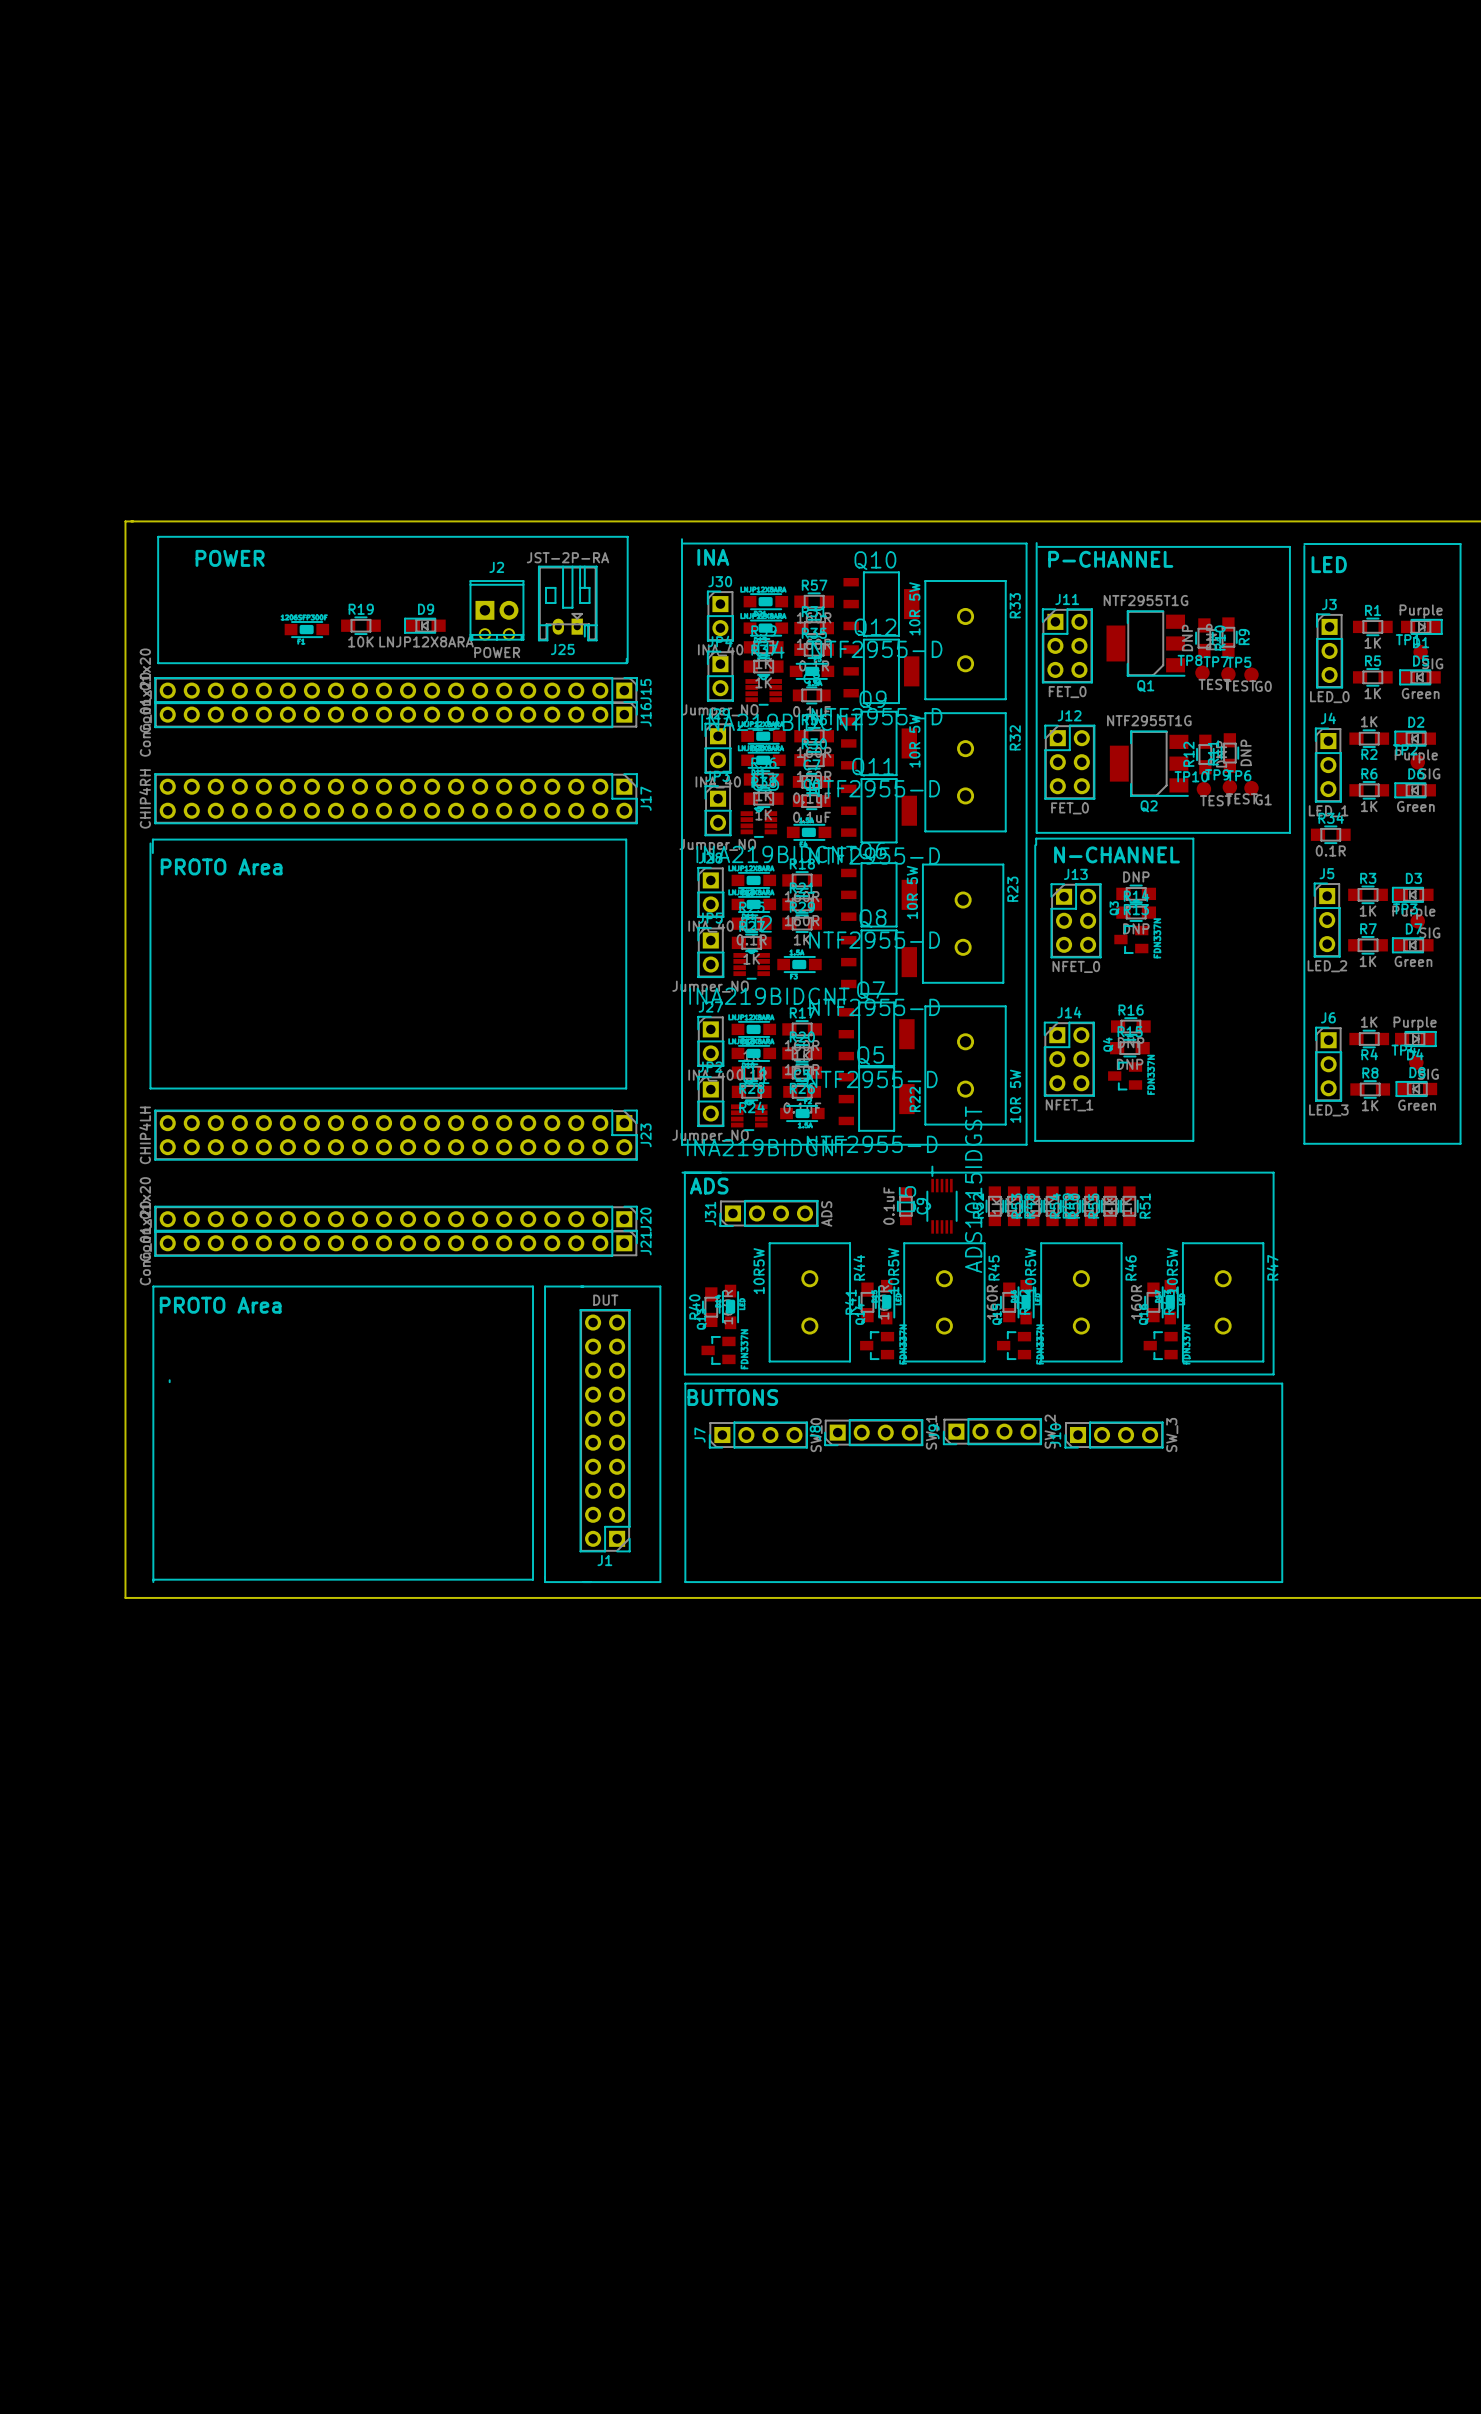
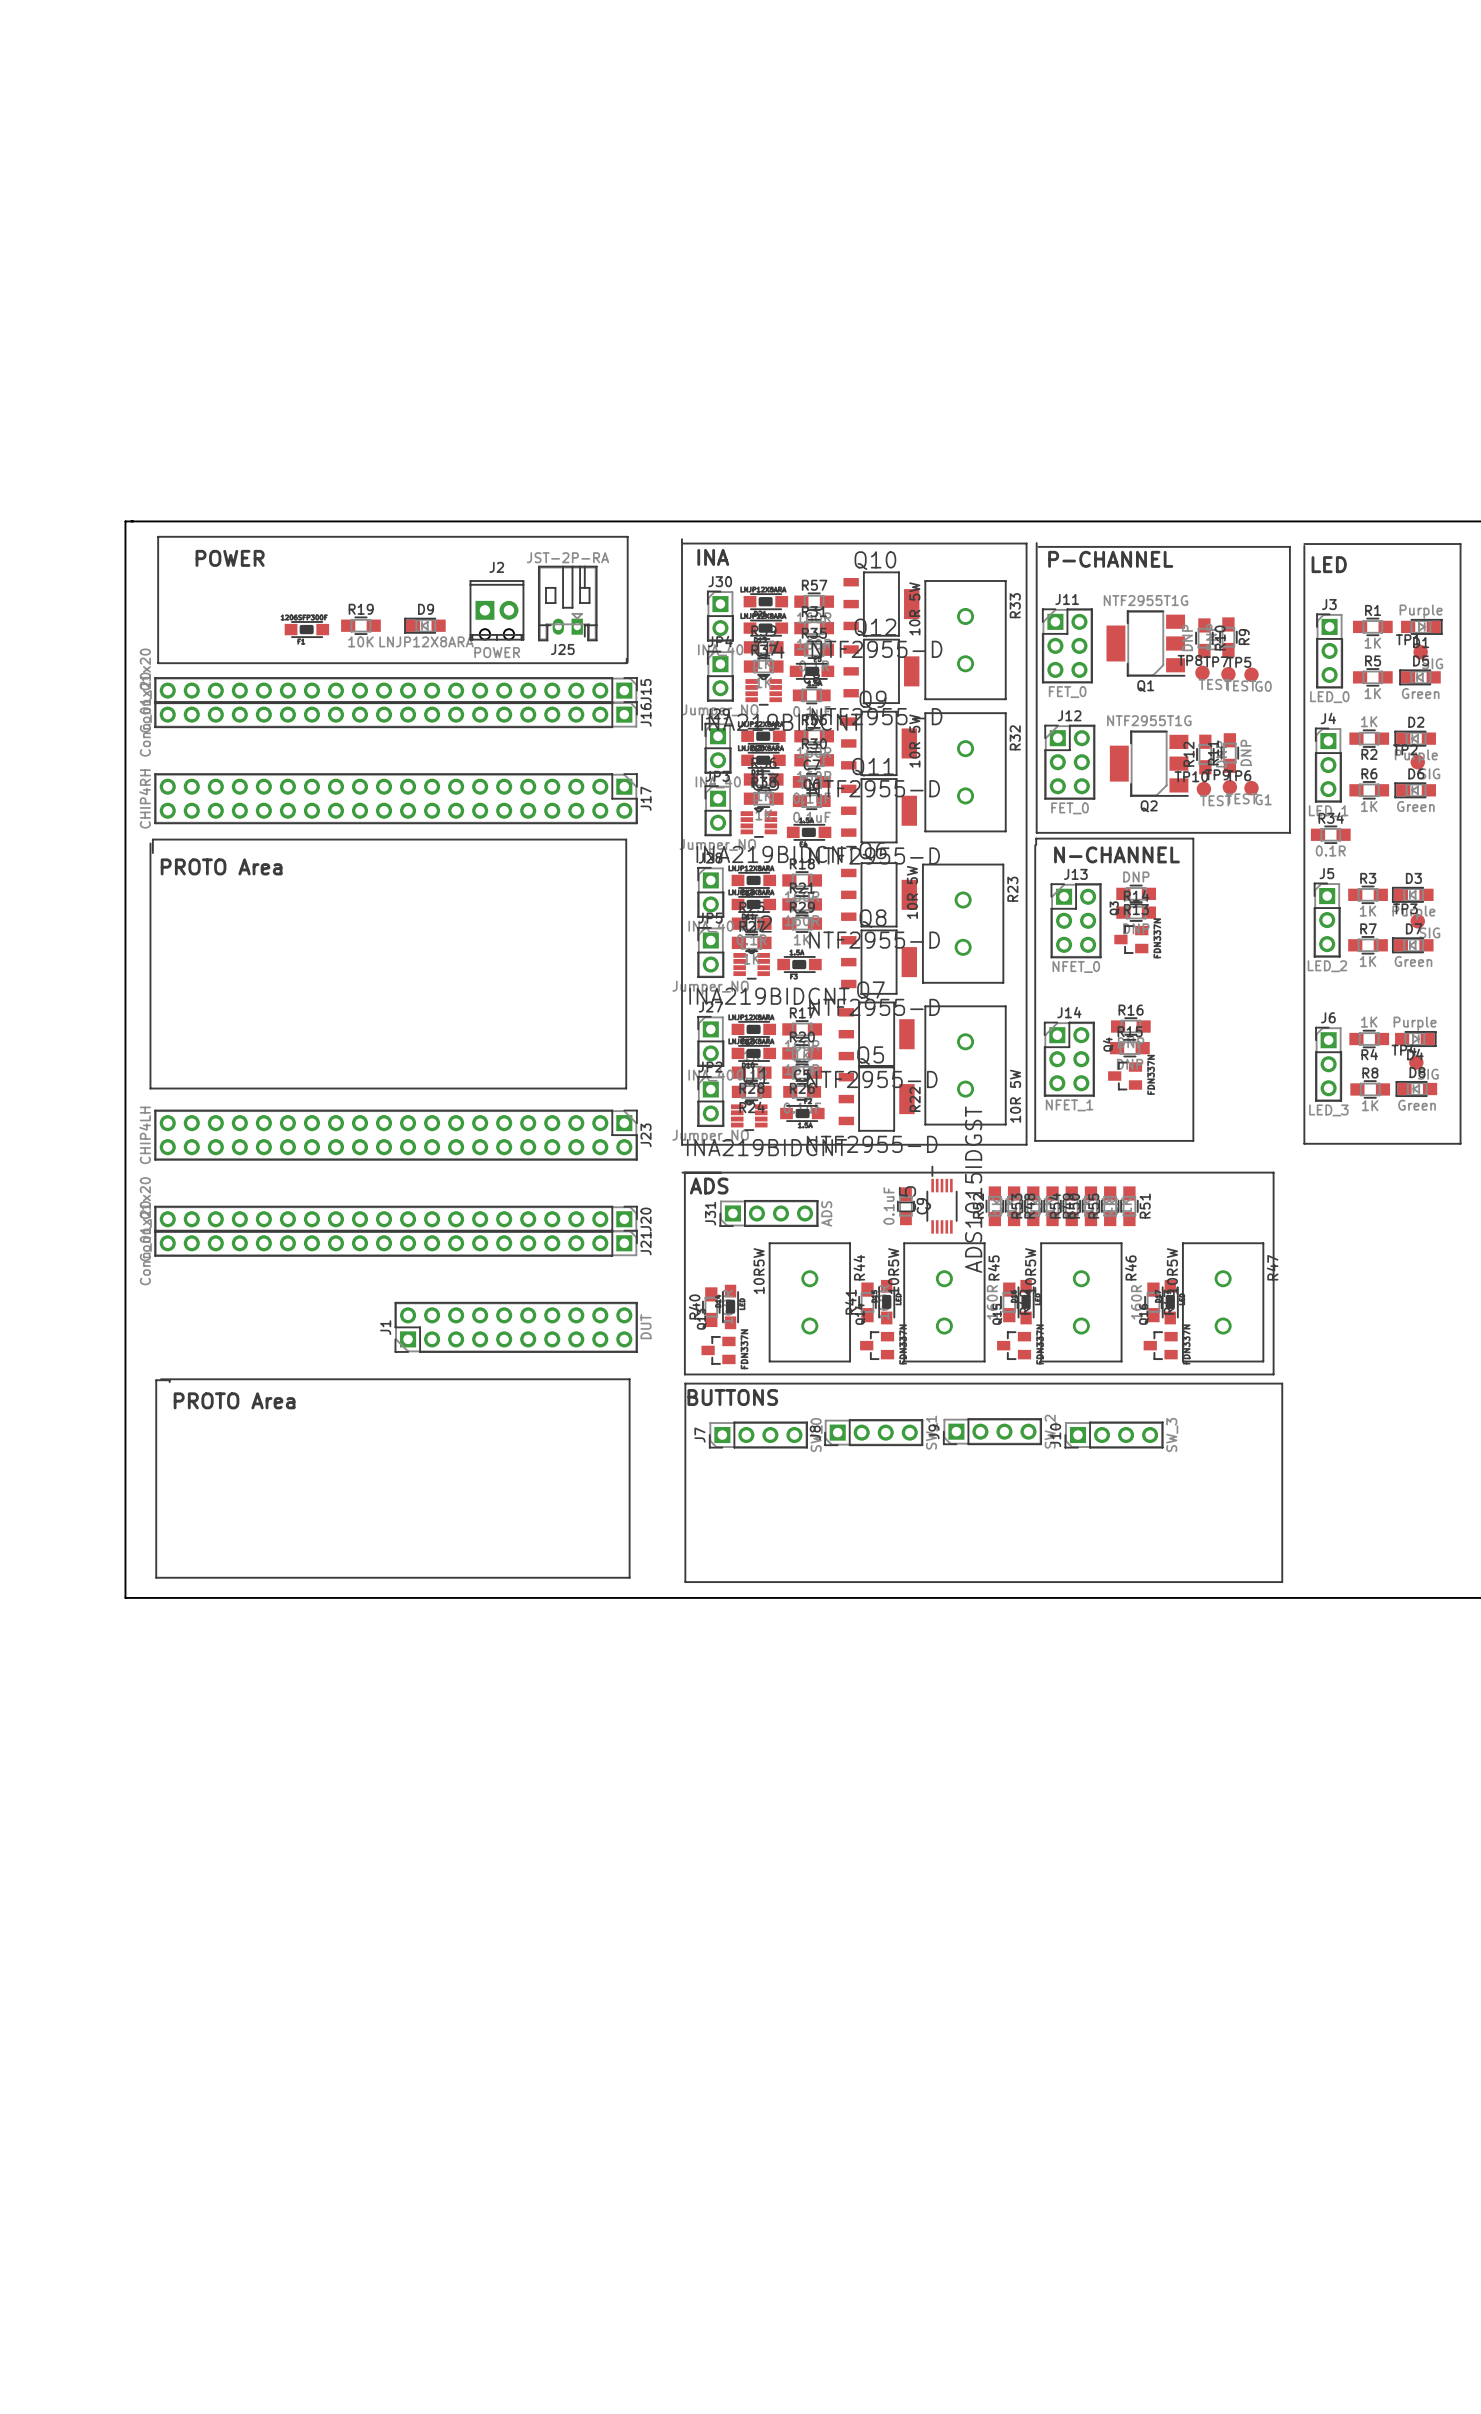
line: (545, 1286) (660, 1286) (660, 1582) (545, 1582) (545, 1286) -> none
text position: PROTO Area (220, 1305) -> PROTO Area (234, 1400)
line: none -> (161, 1379) (629, 1379) (629, 1577) (156, 1577) (156, 1380) (169, 1380)
J1 rotation: 0° (605, 1430) -> 90° clockwise (516, 1327)
line: (153, 1579) (533, 1579) (533, 1286) (153, 1286) (153, 1582) -> none

